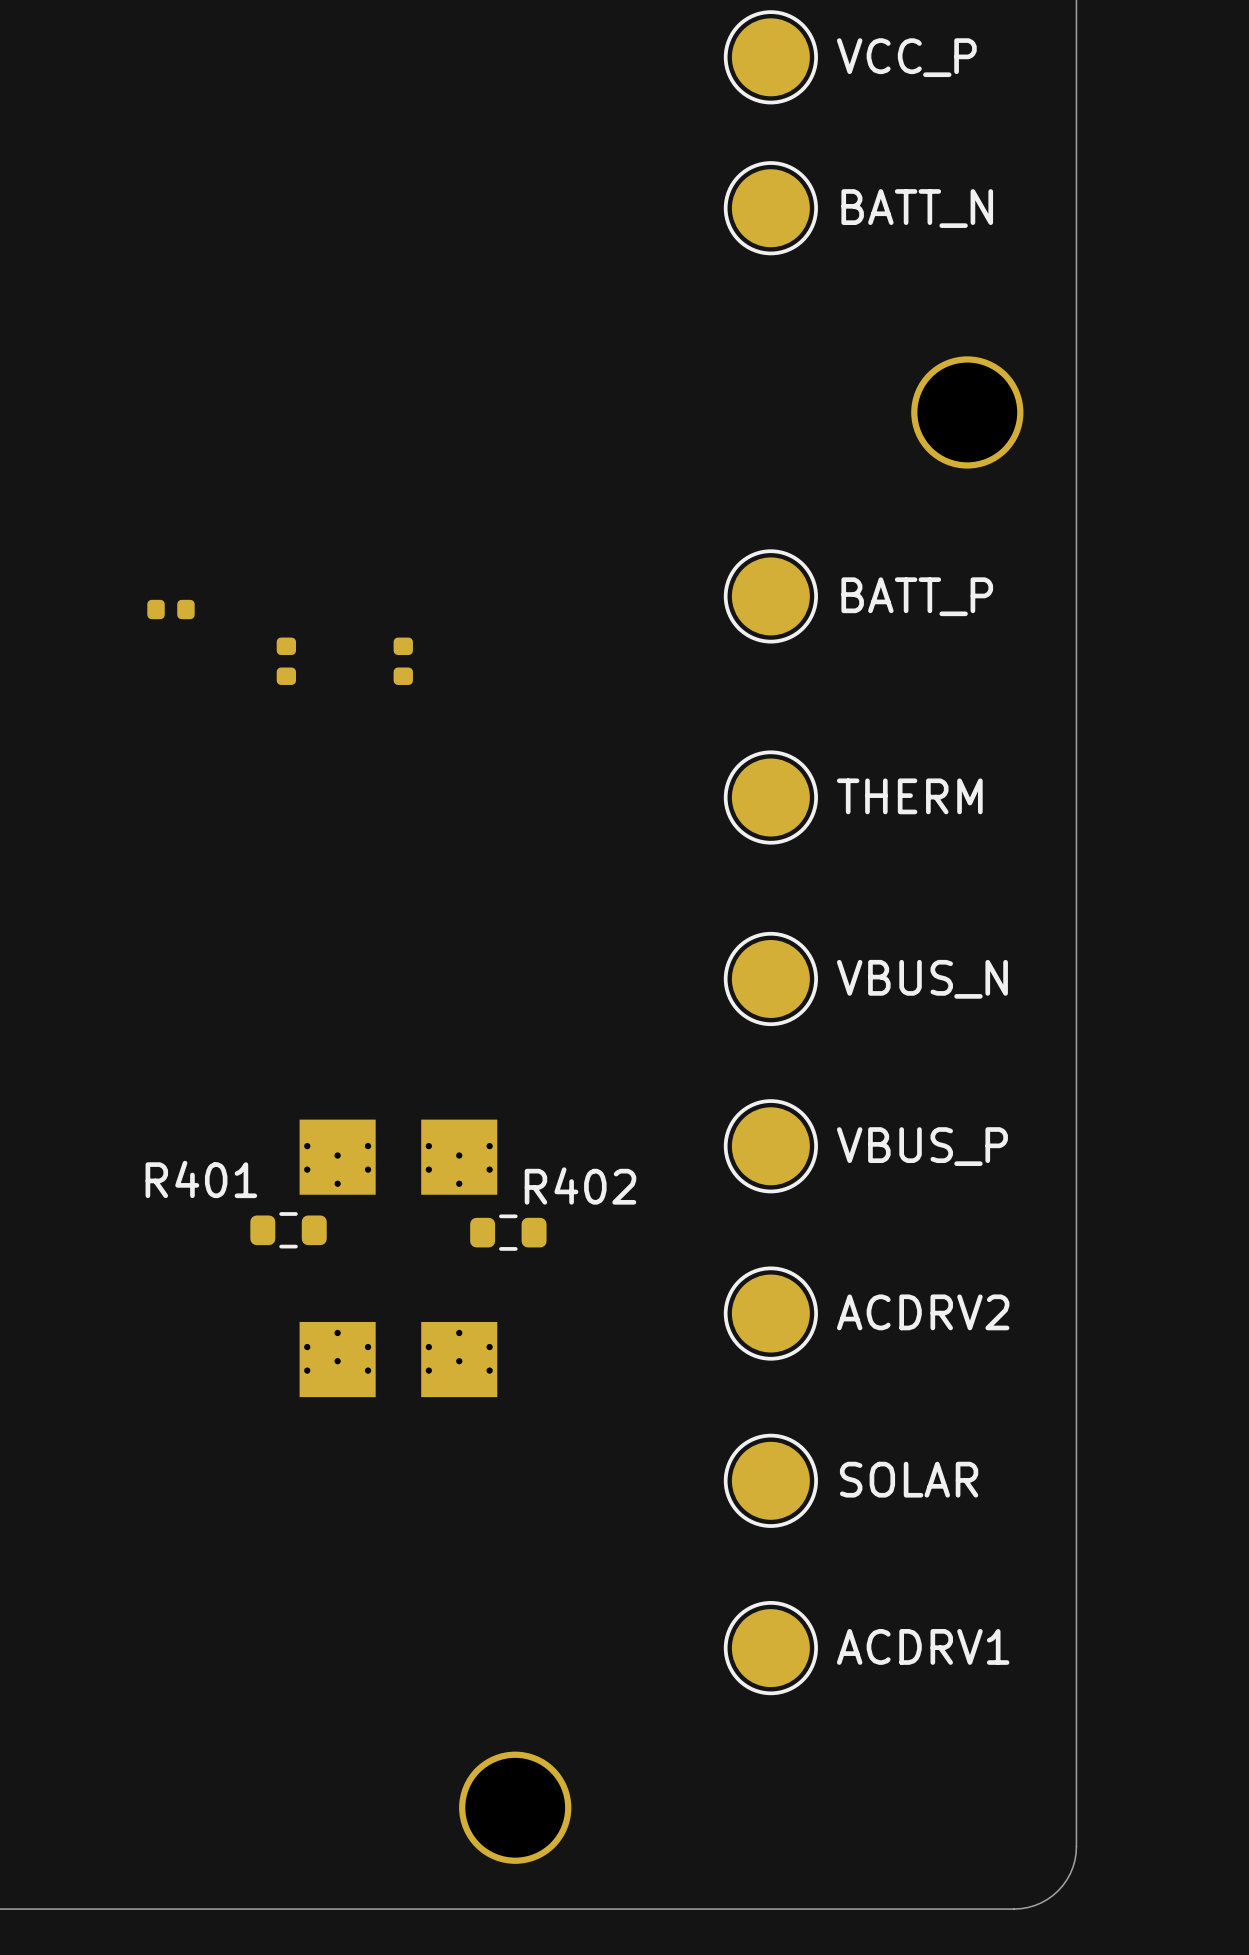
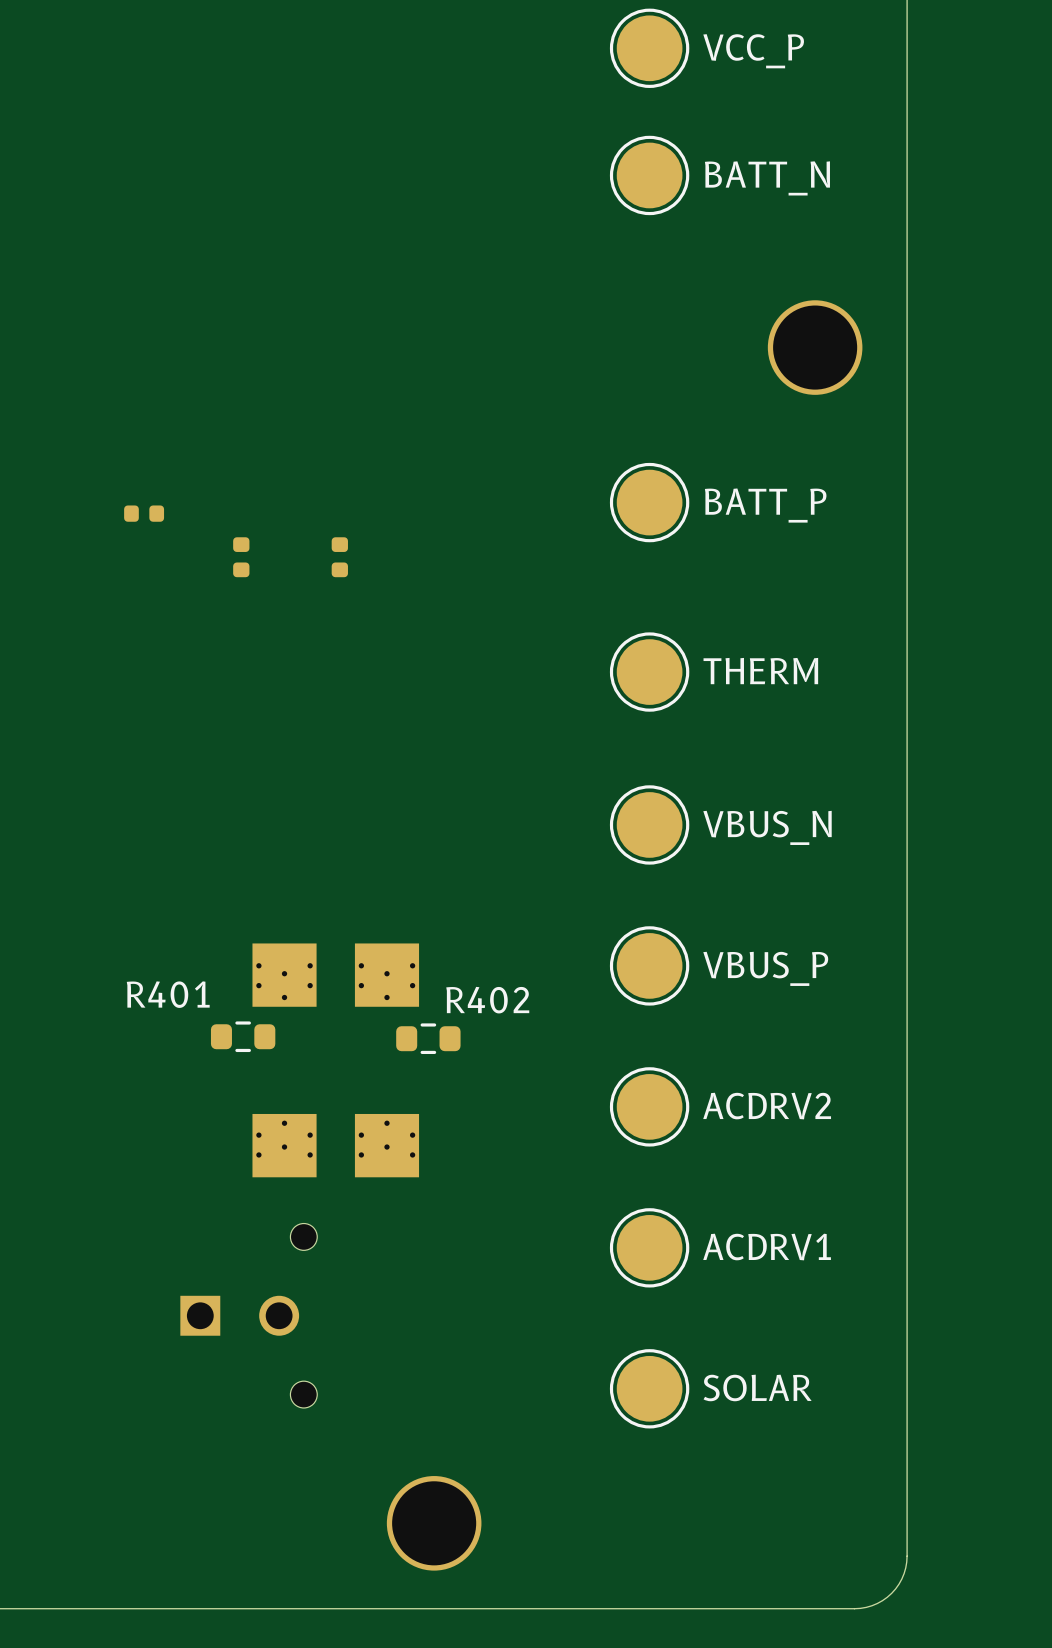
part value: SOLAR (909, 1479) -> ACDRV1 (767, 1247)
part: none -> (248, 1315)
part value: ACDRV1 (923, 1646) -> SOLAR (757, 1387)

